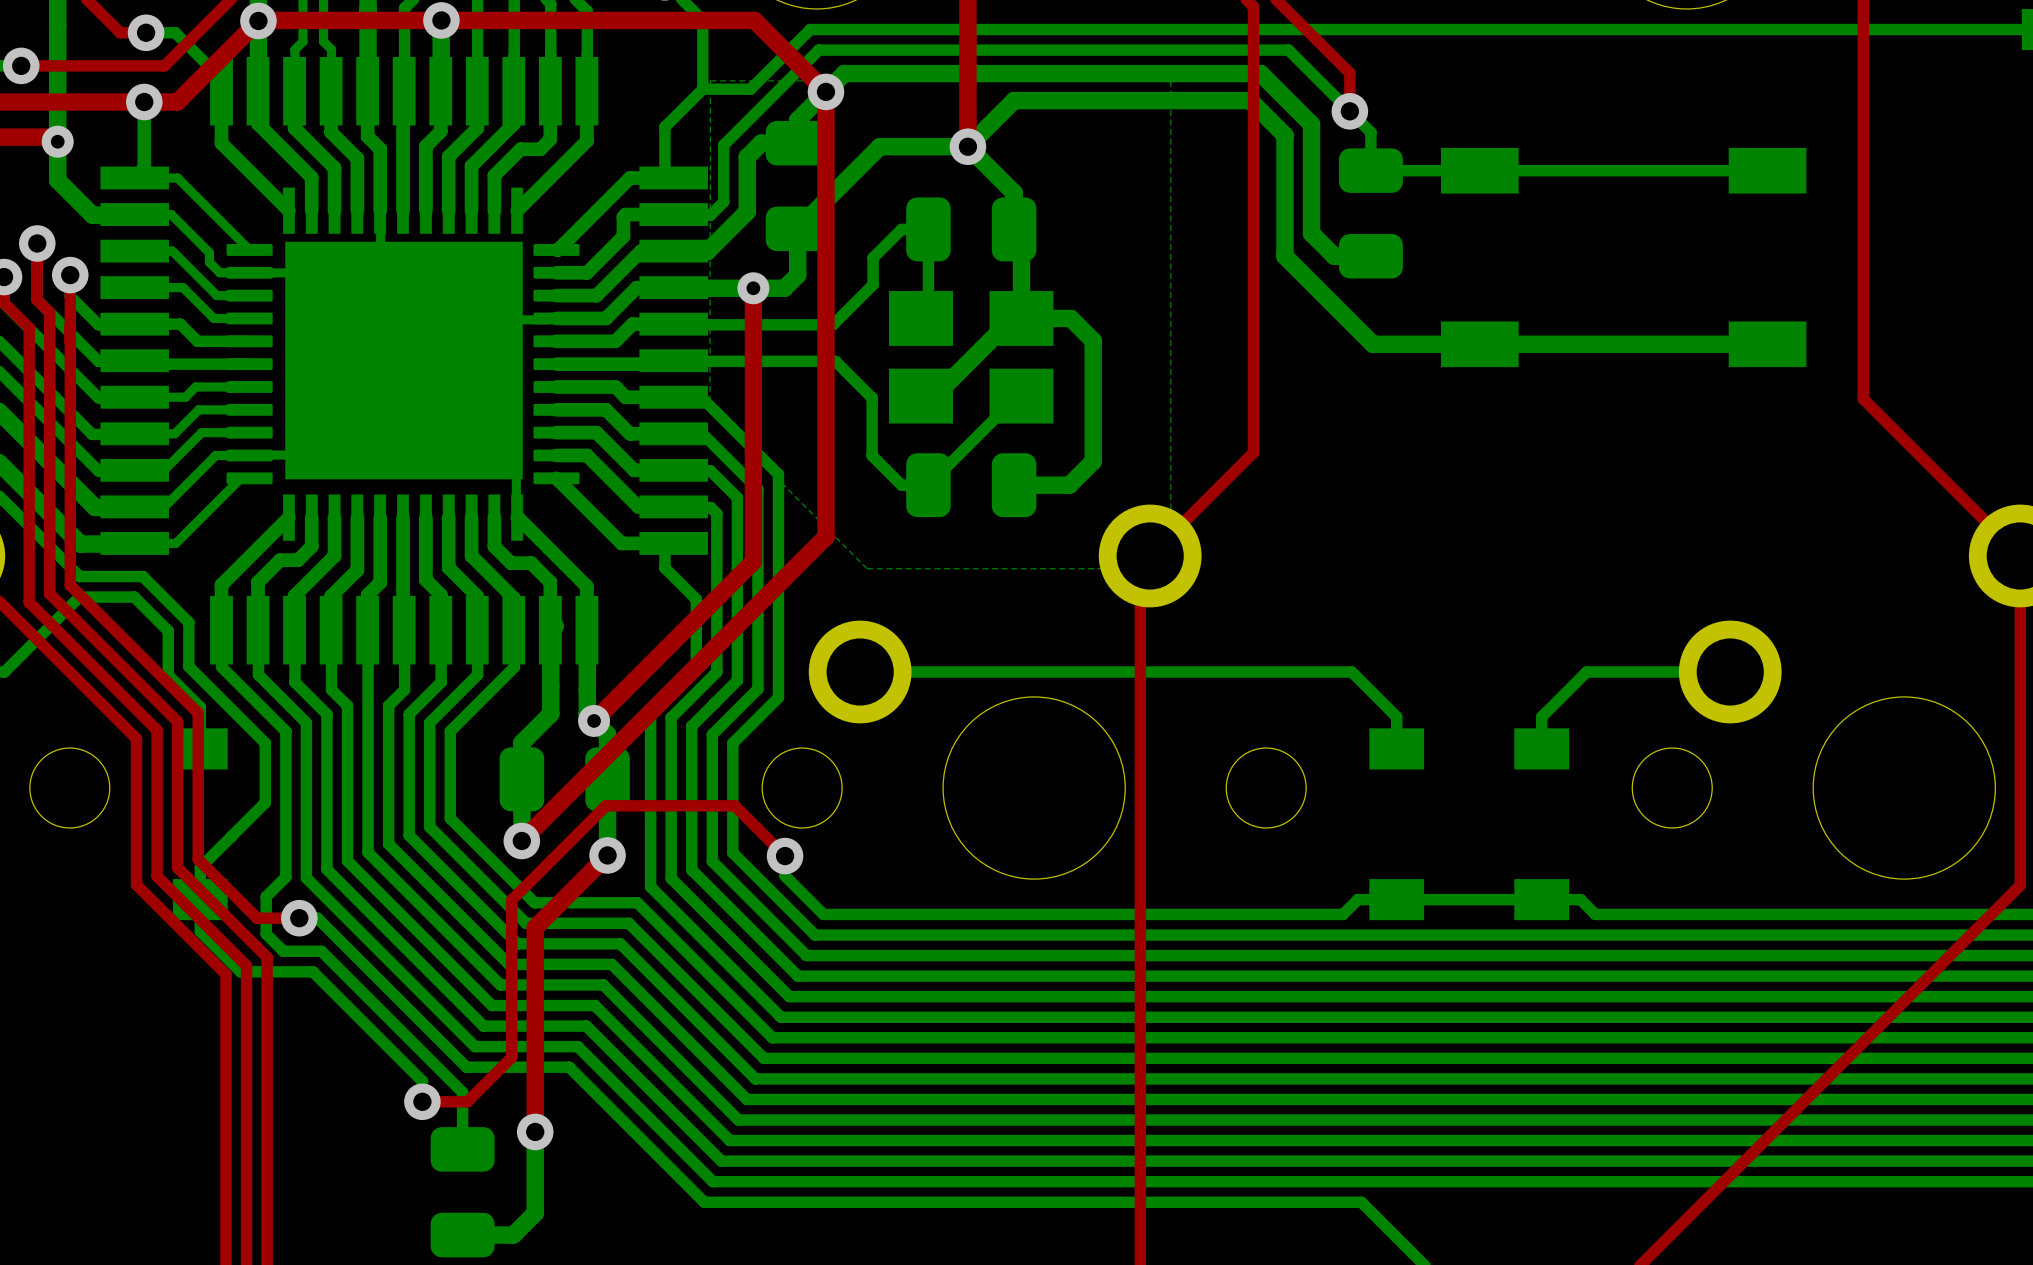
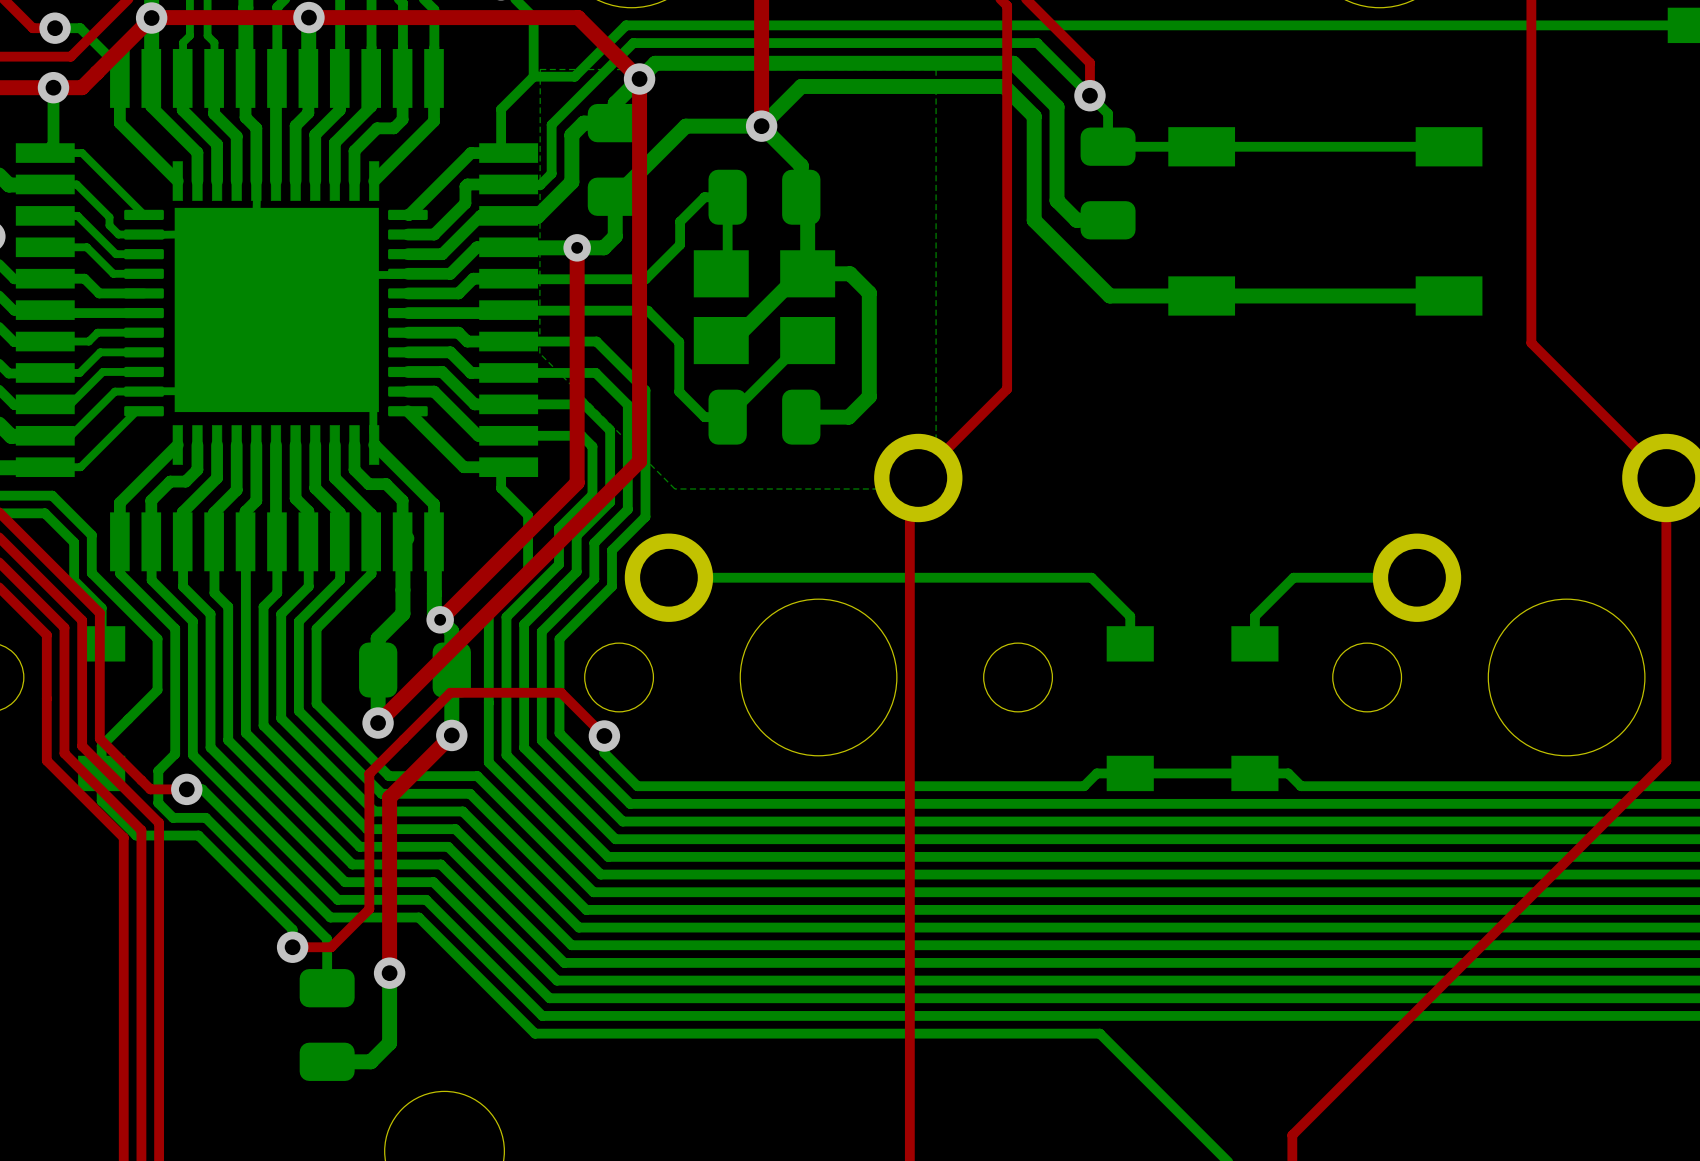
bottom track: (701, 397) (778, 474) (778, 697) -> (508, 341) (596, 341) (645, 390) (645, 516) (612, 550) (612, 586) (598, 599)
bottom track: (664, 434) (703, 434) (757, 489) (757, 689) -> (508, 372) (595, 372) (627, 404) (627, 509) (594, 543) (594, 579) (581, 592)
bottom track: (664, 470) (710, 470) (737, 497) (737, 680) -> (508, 404) (584, 404) (610, 430) (610, 502) (576, 535) (576, 571) (563, 585)
bottom track: (664, 507) (710, 507) (716, 513) (716, 672) -> (508, 435) (581, 435) (592, 446) (592, 494) (558, 528) (558, 564) (545, 577)

